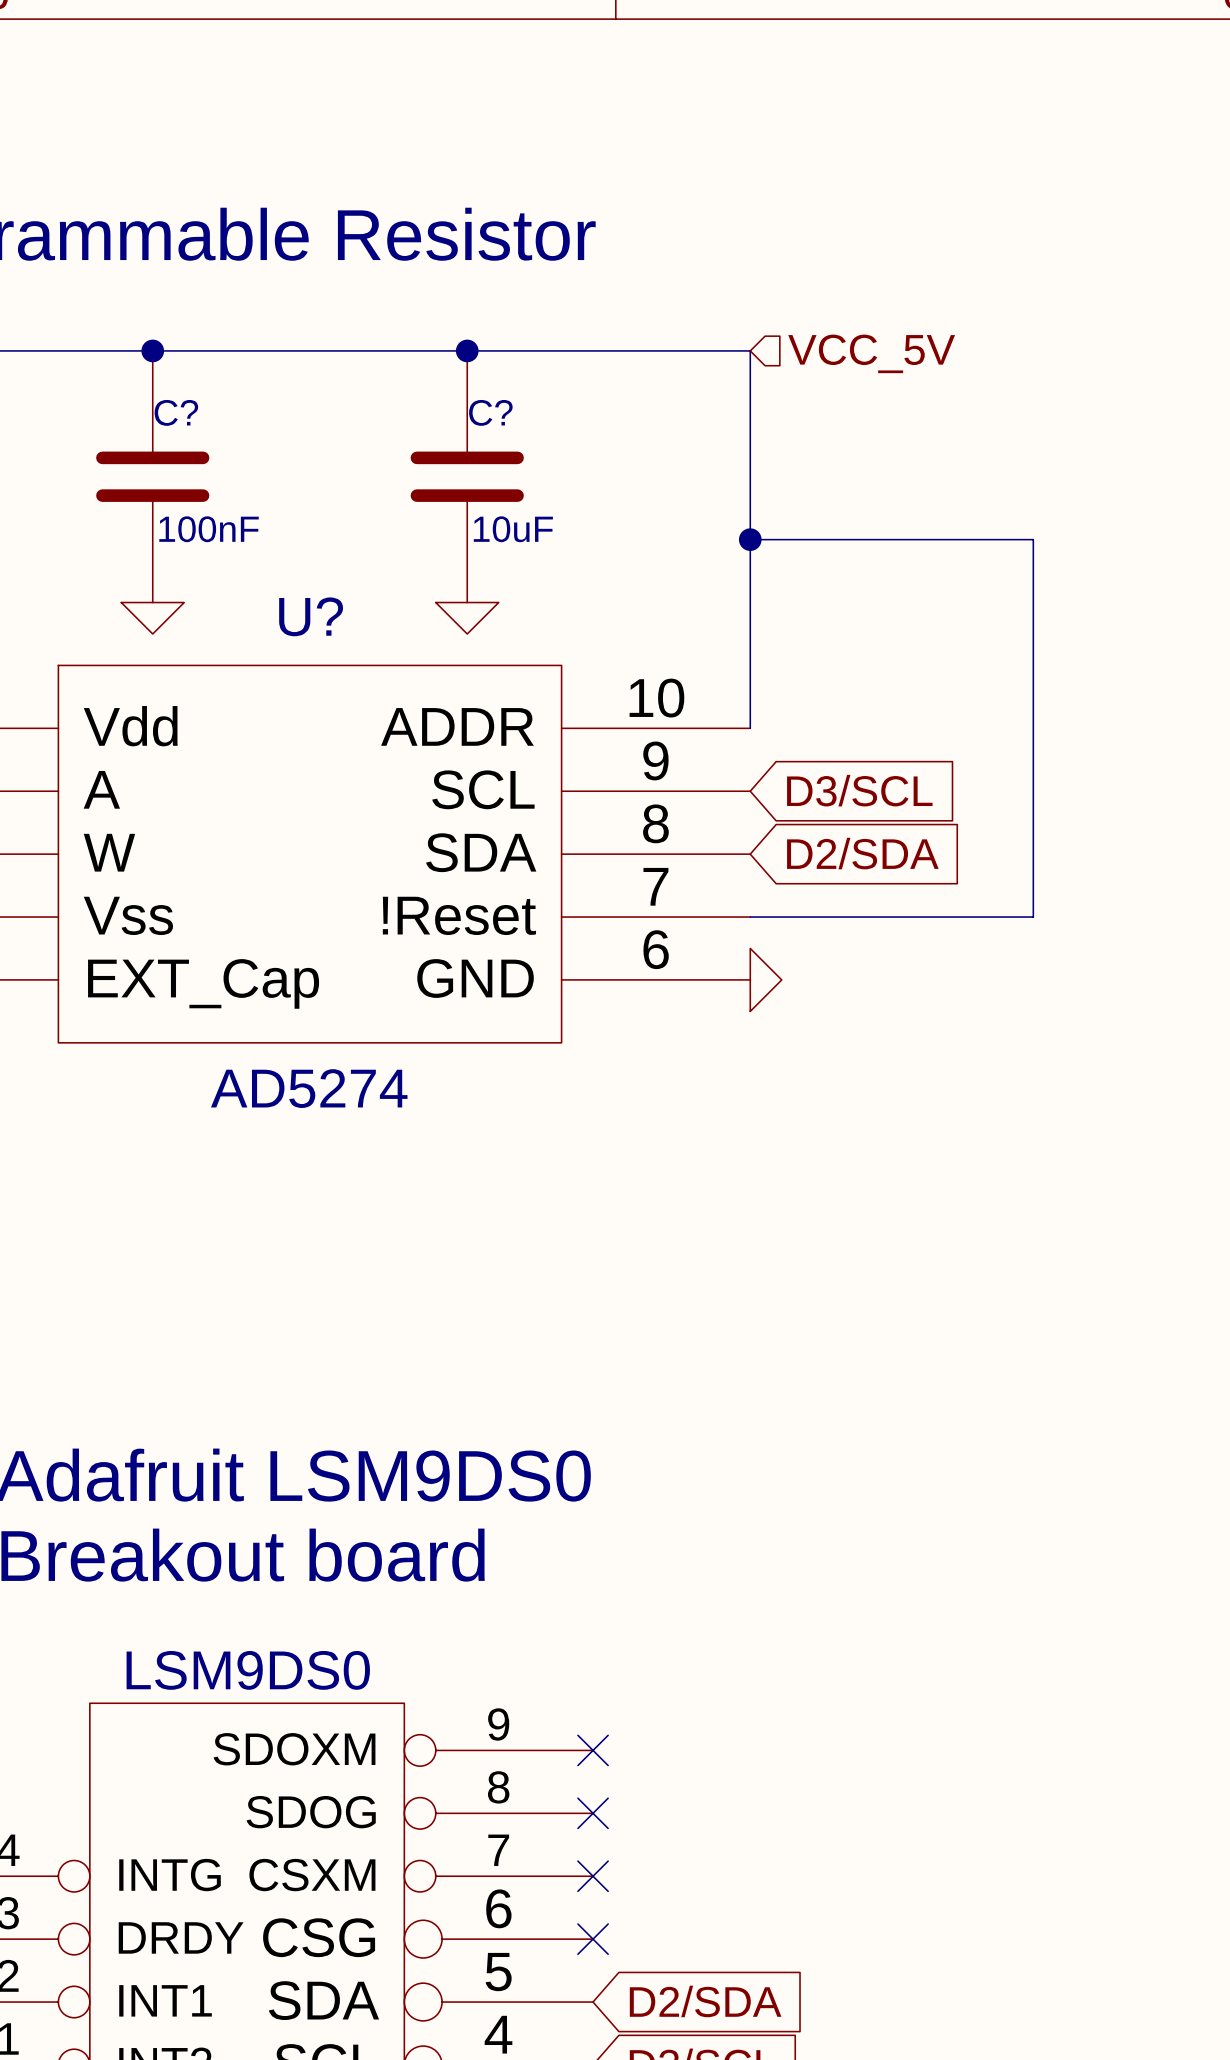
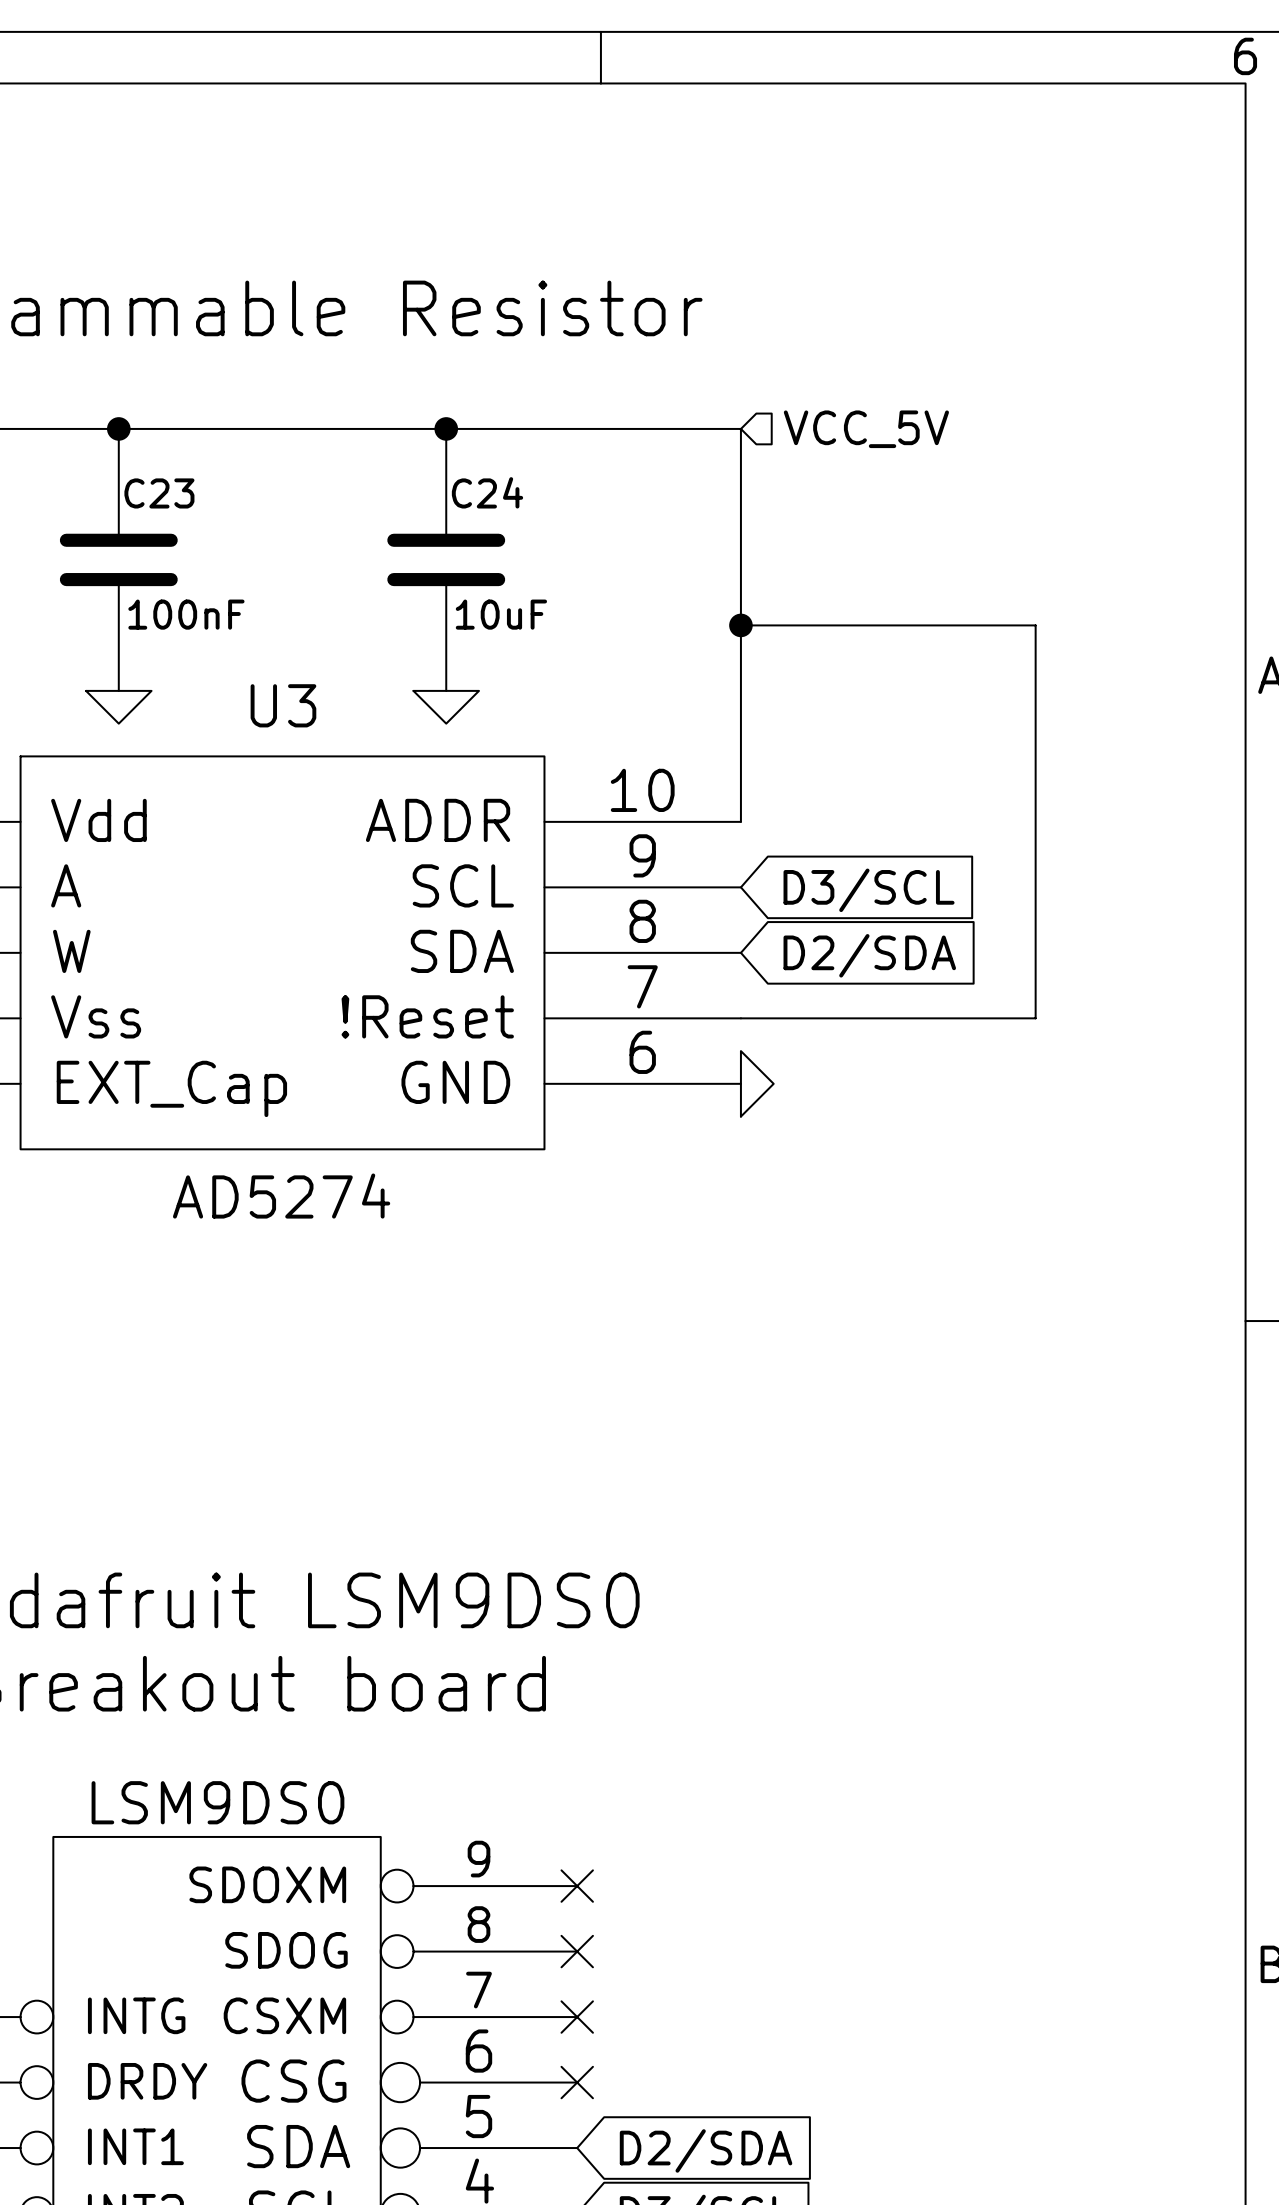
C? name: C? (176, 412) -> C23 (159, 493)
C? name: C? (490, 412) -> C24 (487, 492)
U? name: U? (311, 616) -> U3 (283, 705)

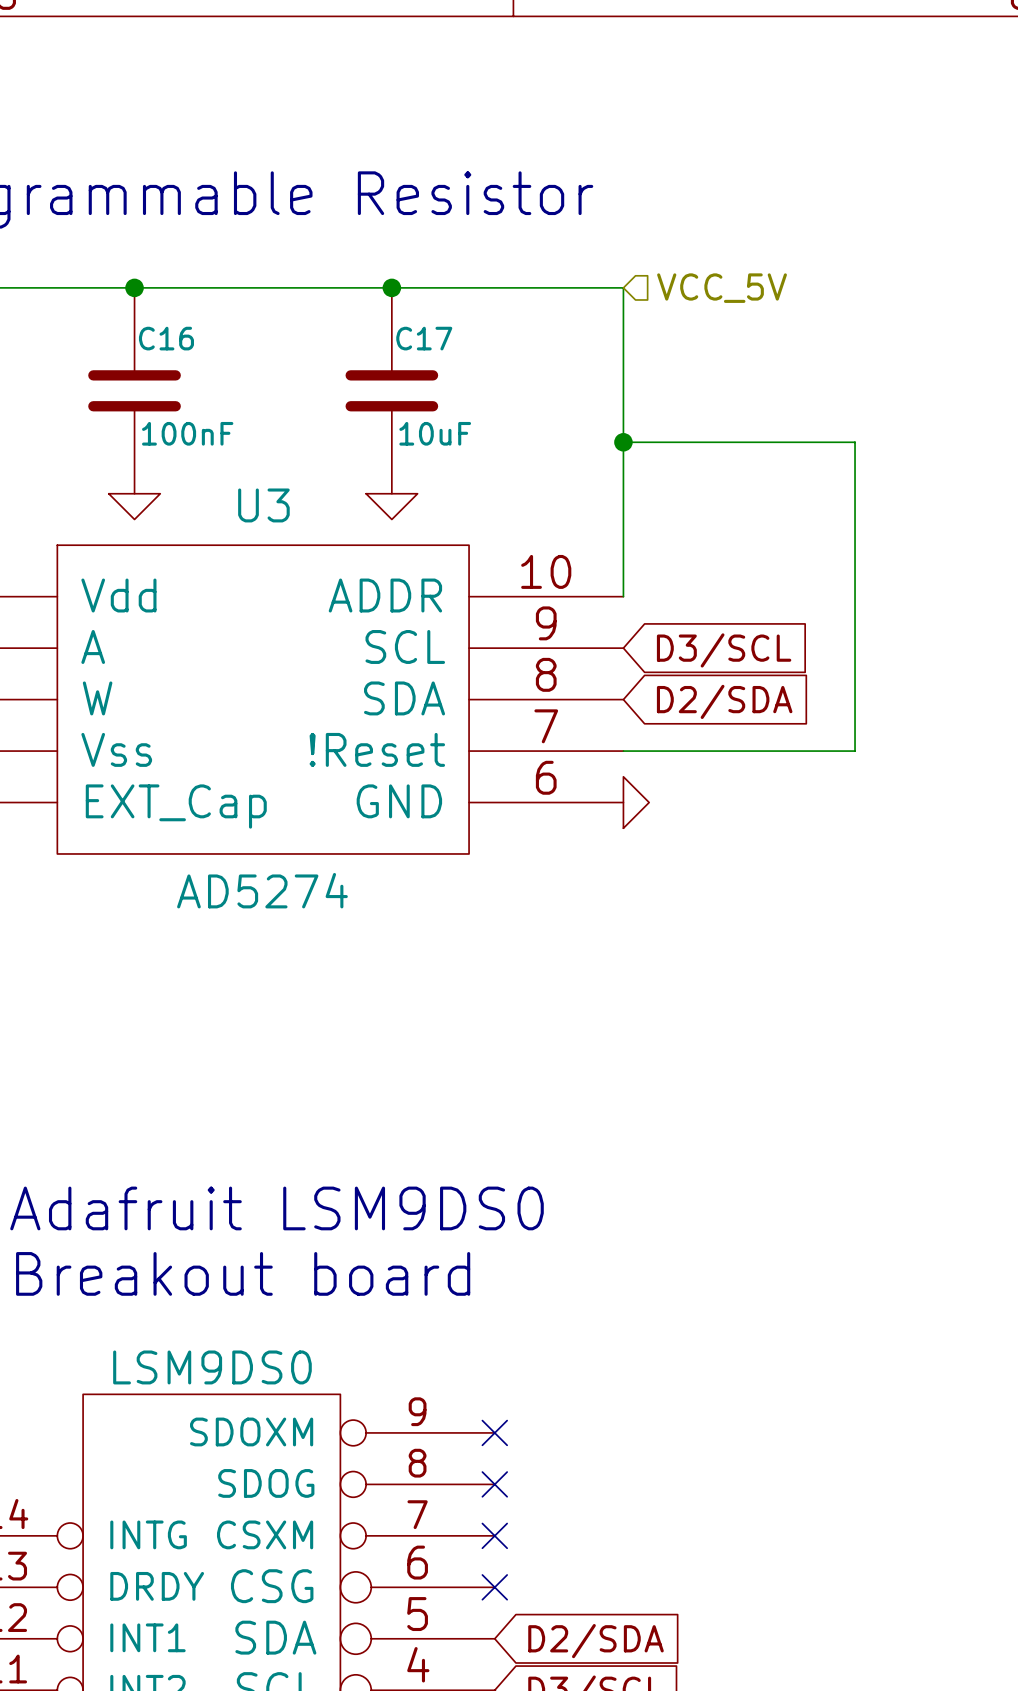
C24 name: C24 (487, 492) -> C17 (424, 338)
C23 name: C23 (159, 493) -> C16 (166, 338)

